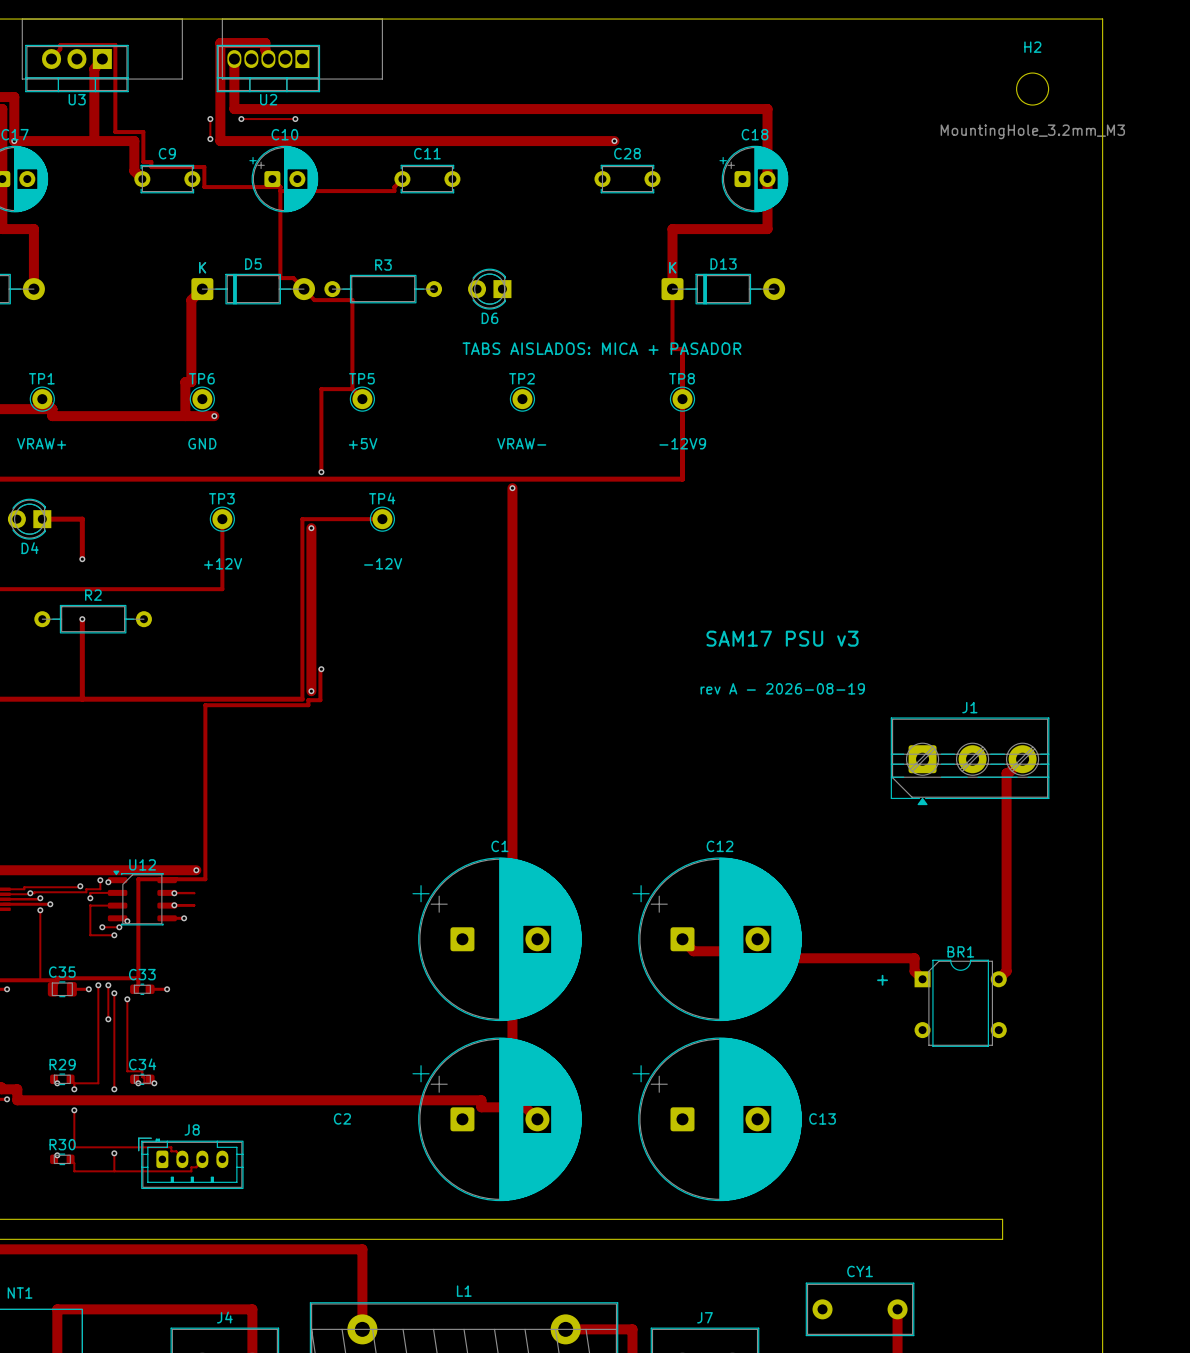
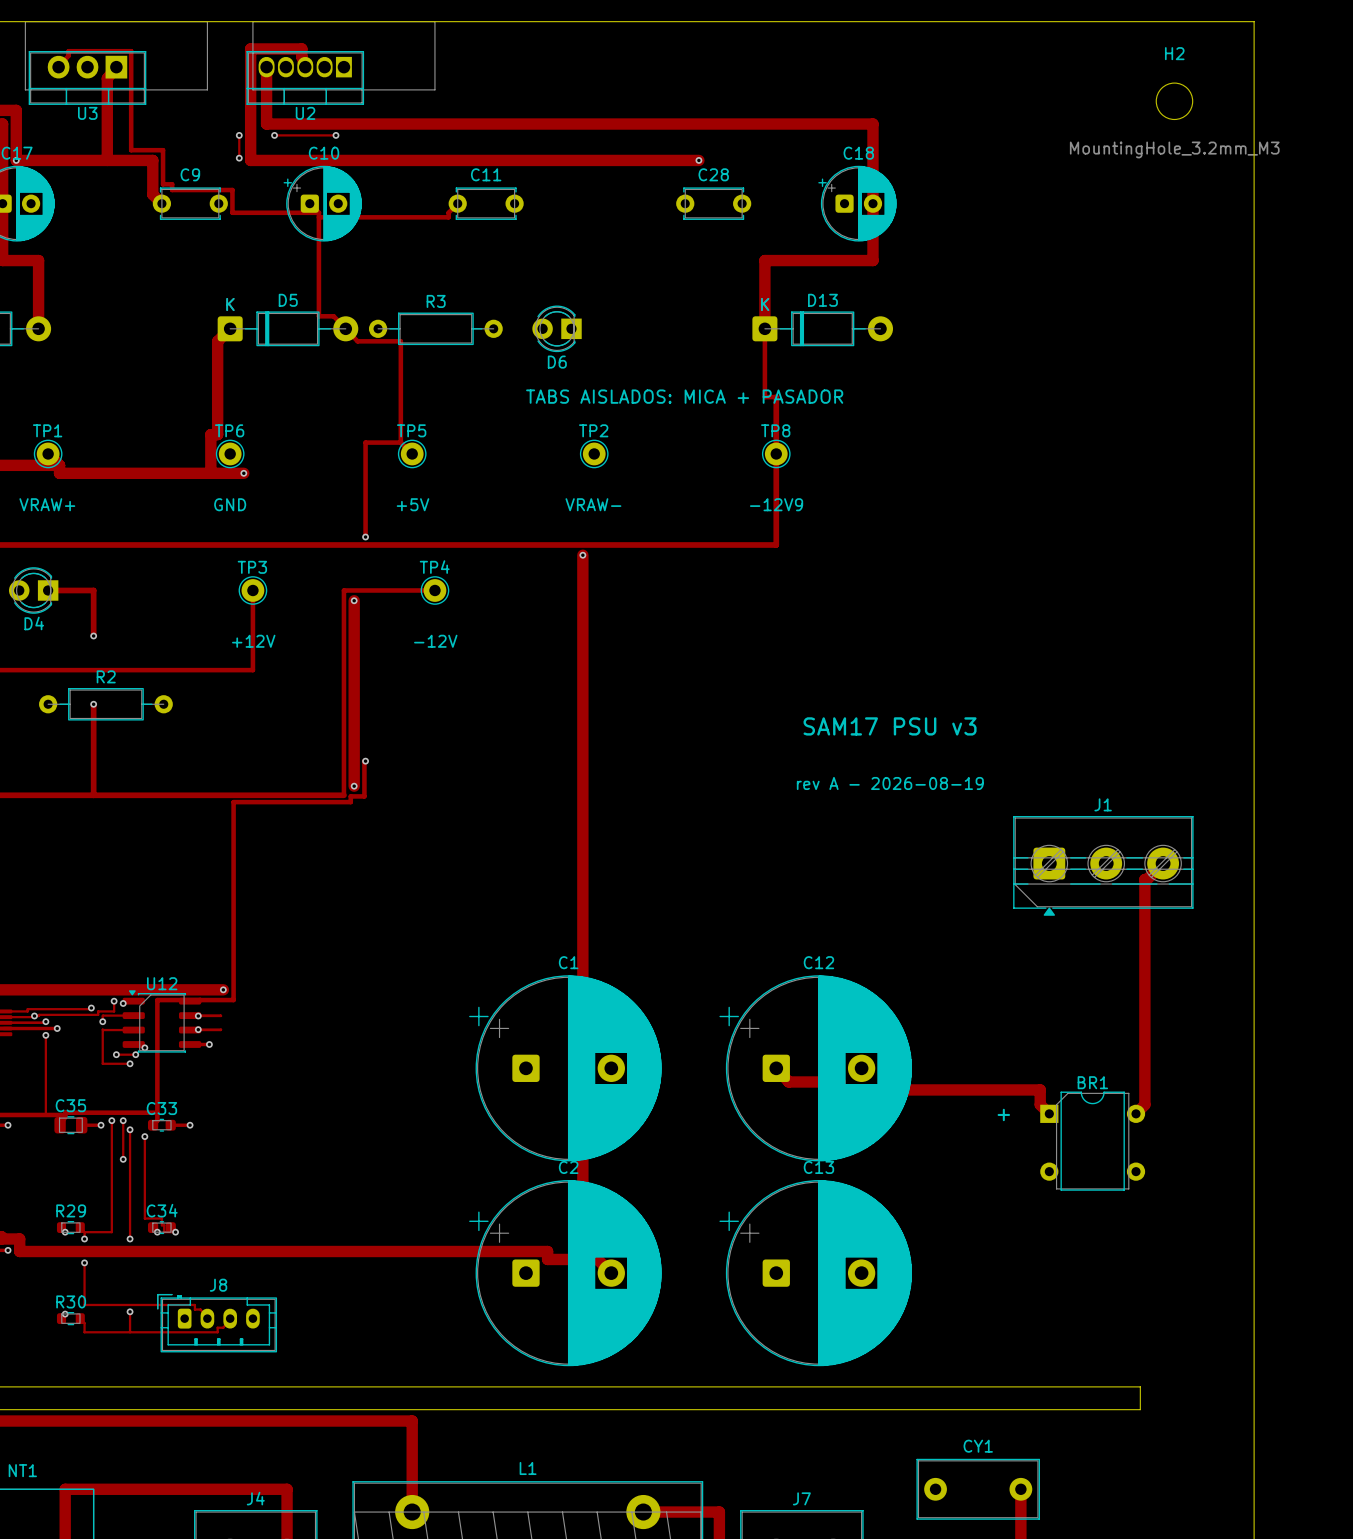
C2 name position: C2 (342, 1118) -> C2 (568, 1167)
C13 name position: C13 (822, 1118) -> C13 (818, 1167)

